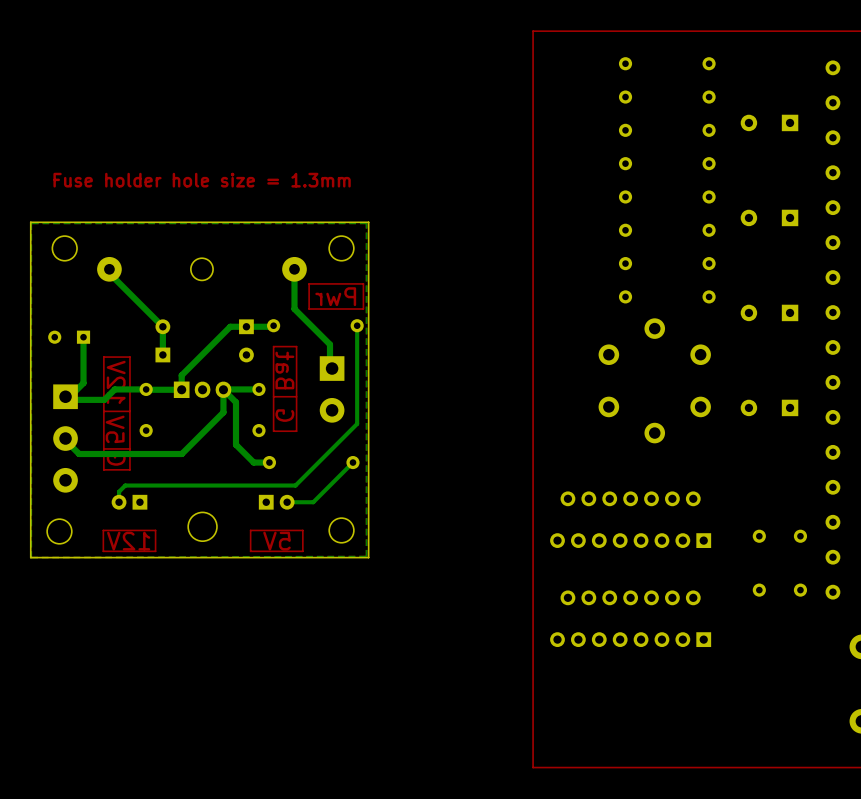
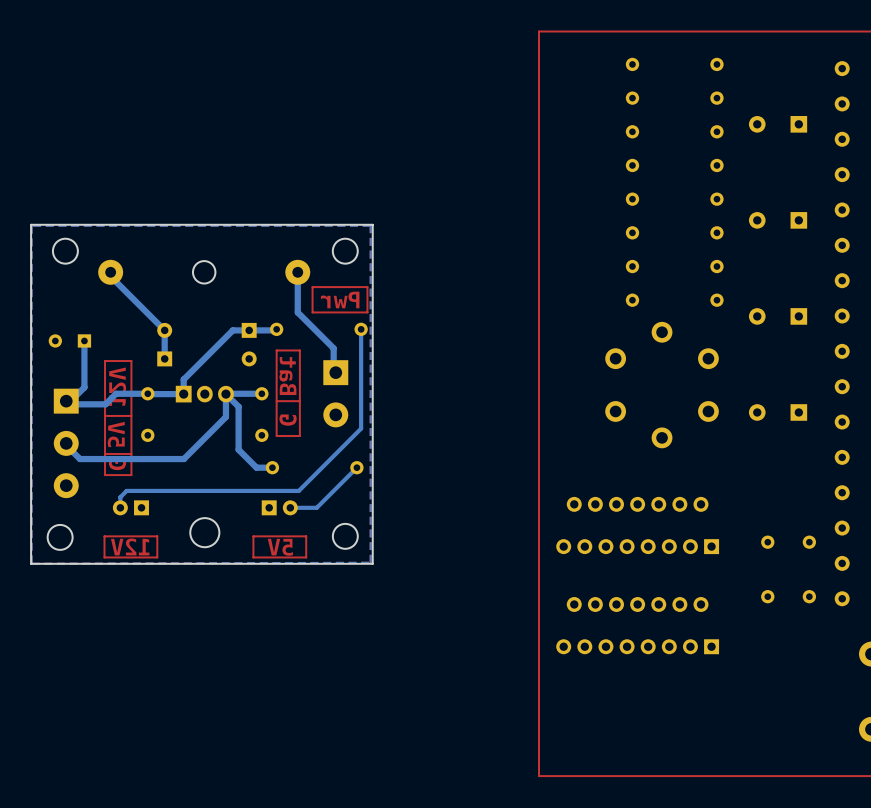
text: Fuse holder hole size = 1.3mm (202, 180) -> none

